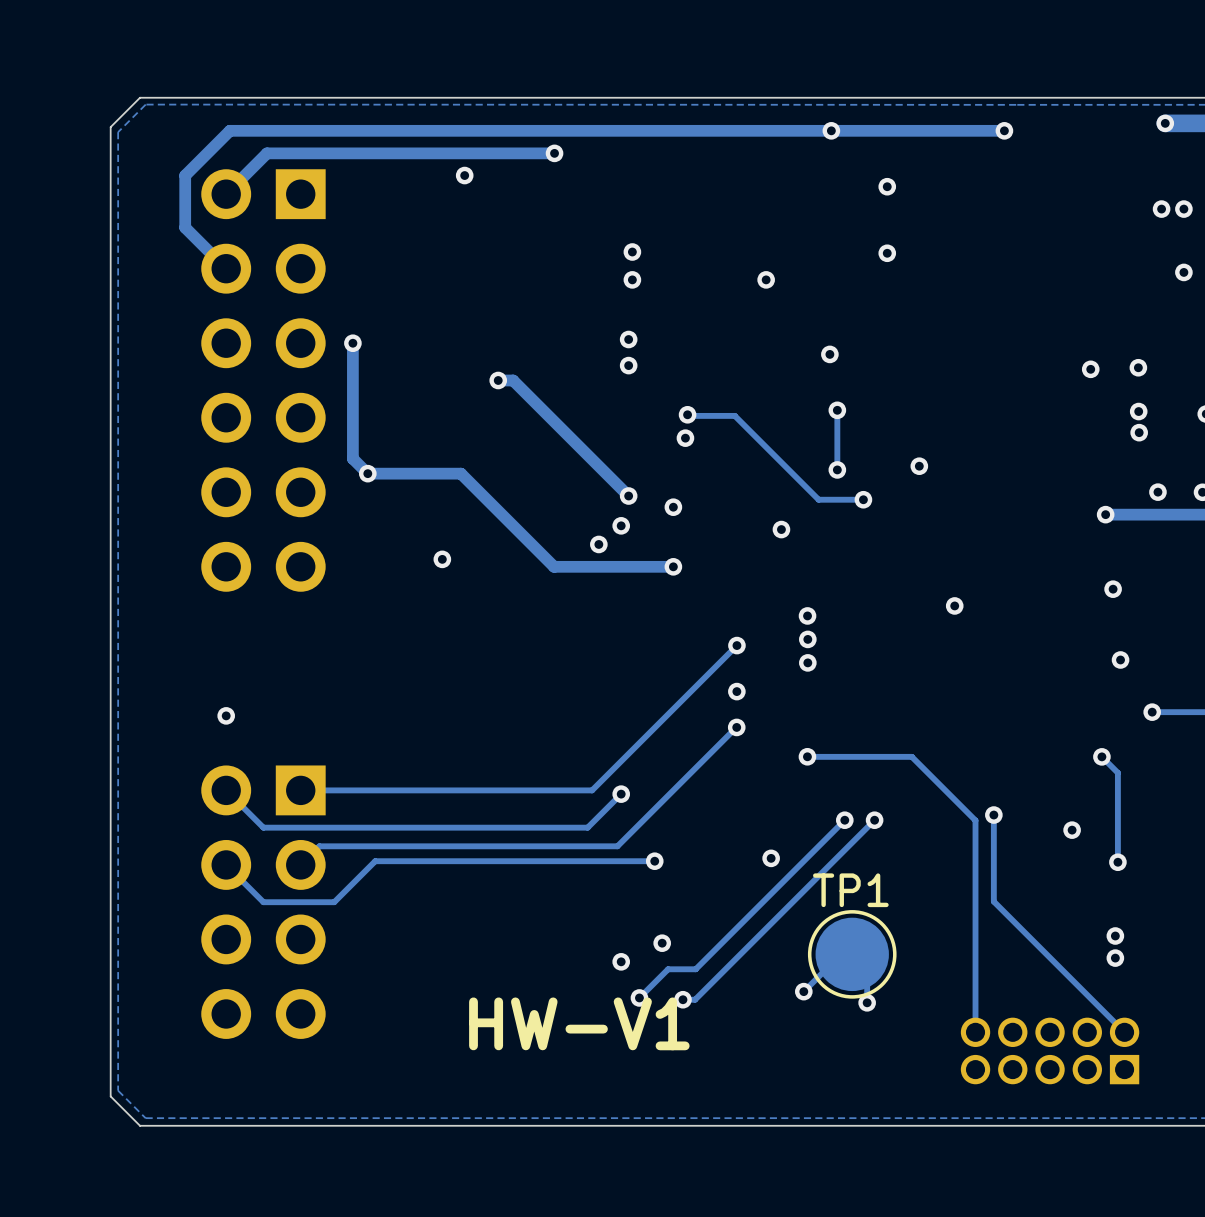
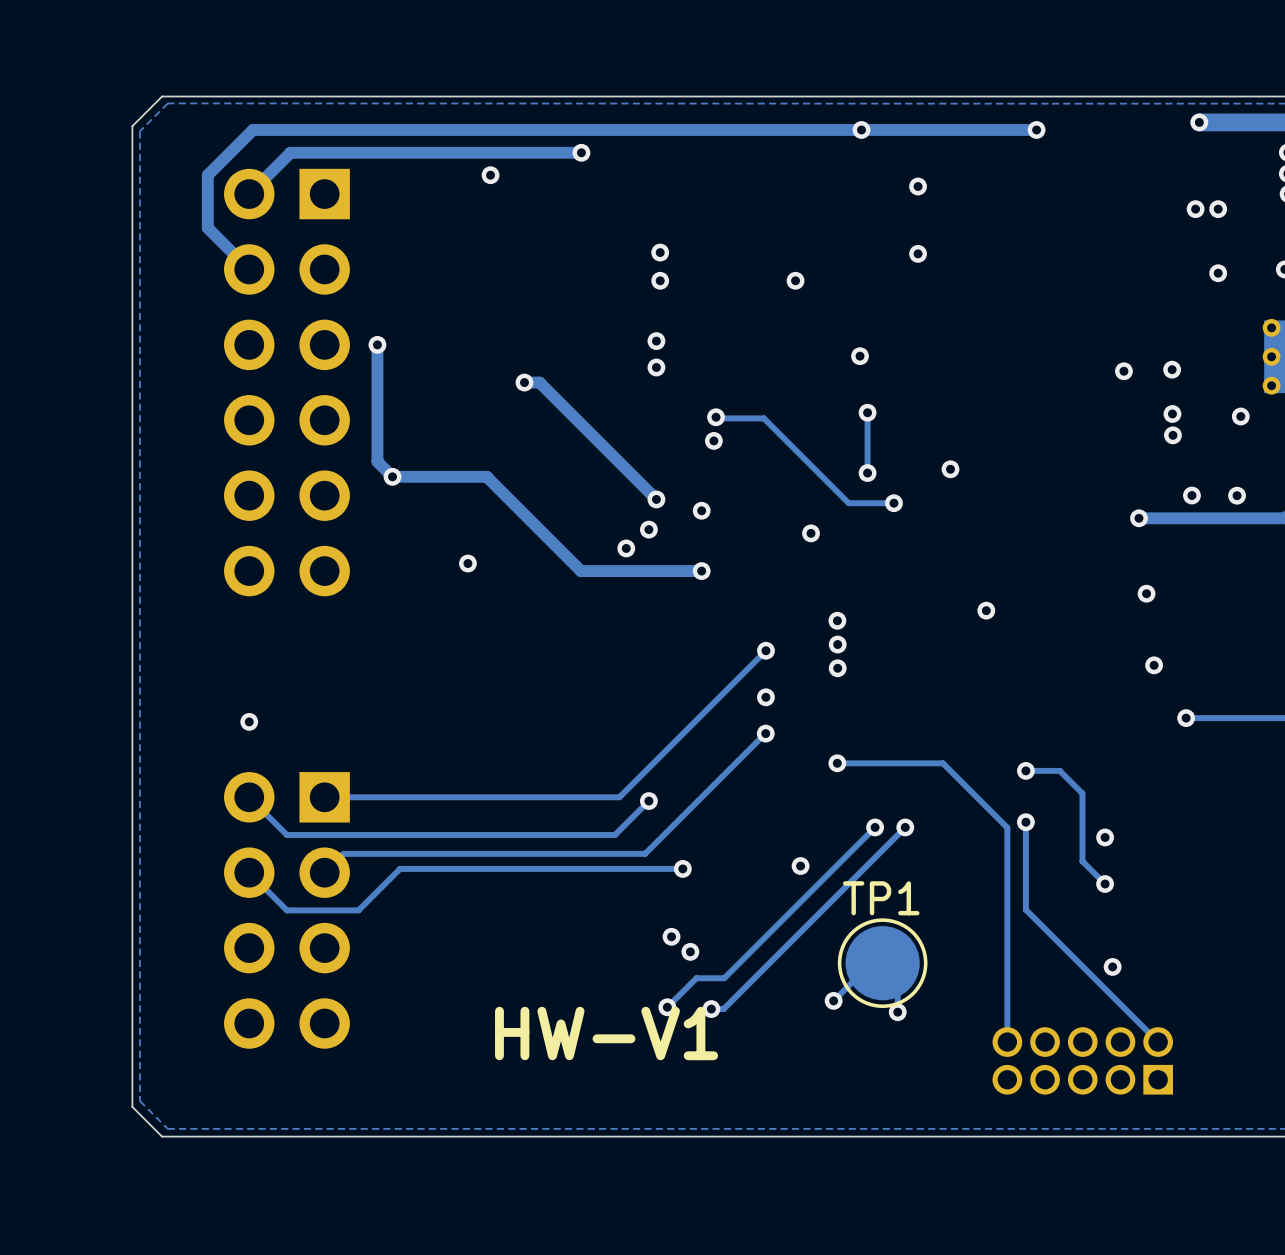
track: (1101, 756) (1117, 772) (1117, 862) -> none
via: (1101, 756) -> none
track: none -> (1025, 770) (1059, 770) (1082, 793) (1082, 861) (1105, 884)
via: none -> (1025, 770)
via: (1117, 862) -> none
via: none -> (1105, 884)
via: (1115, 935) -> none
via: none -> (1112, 966)
via: (1115, 958) -> none
via position: (621, 961) -> (671, 936)

